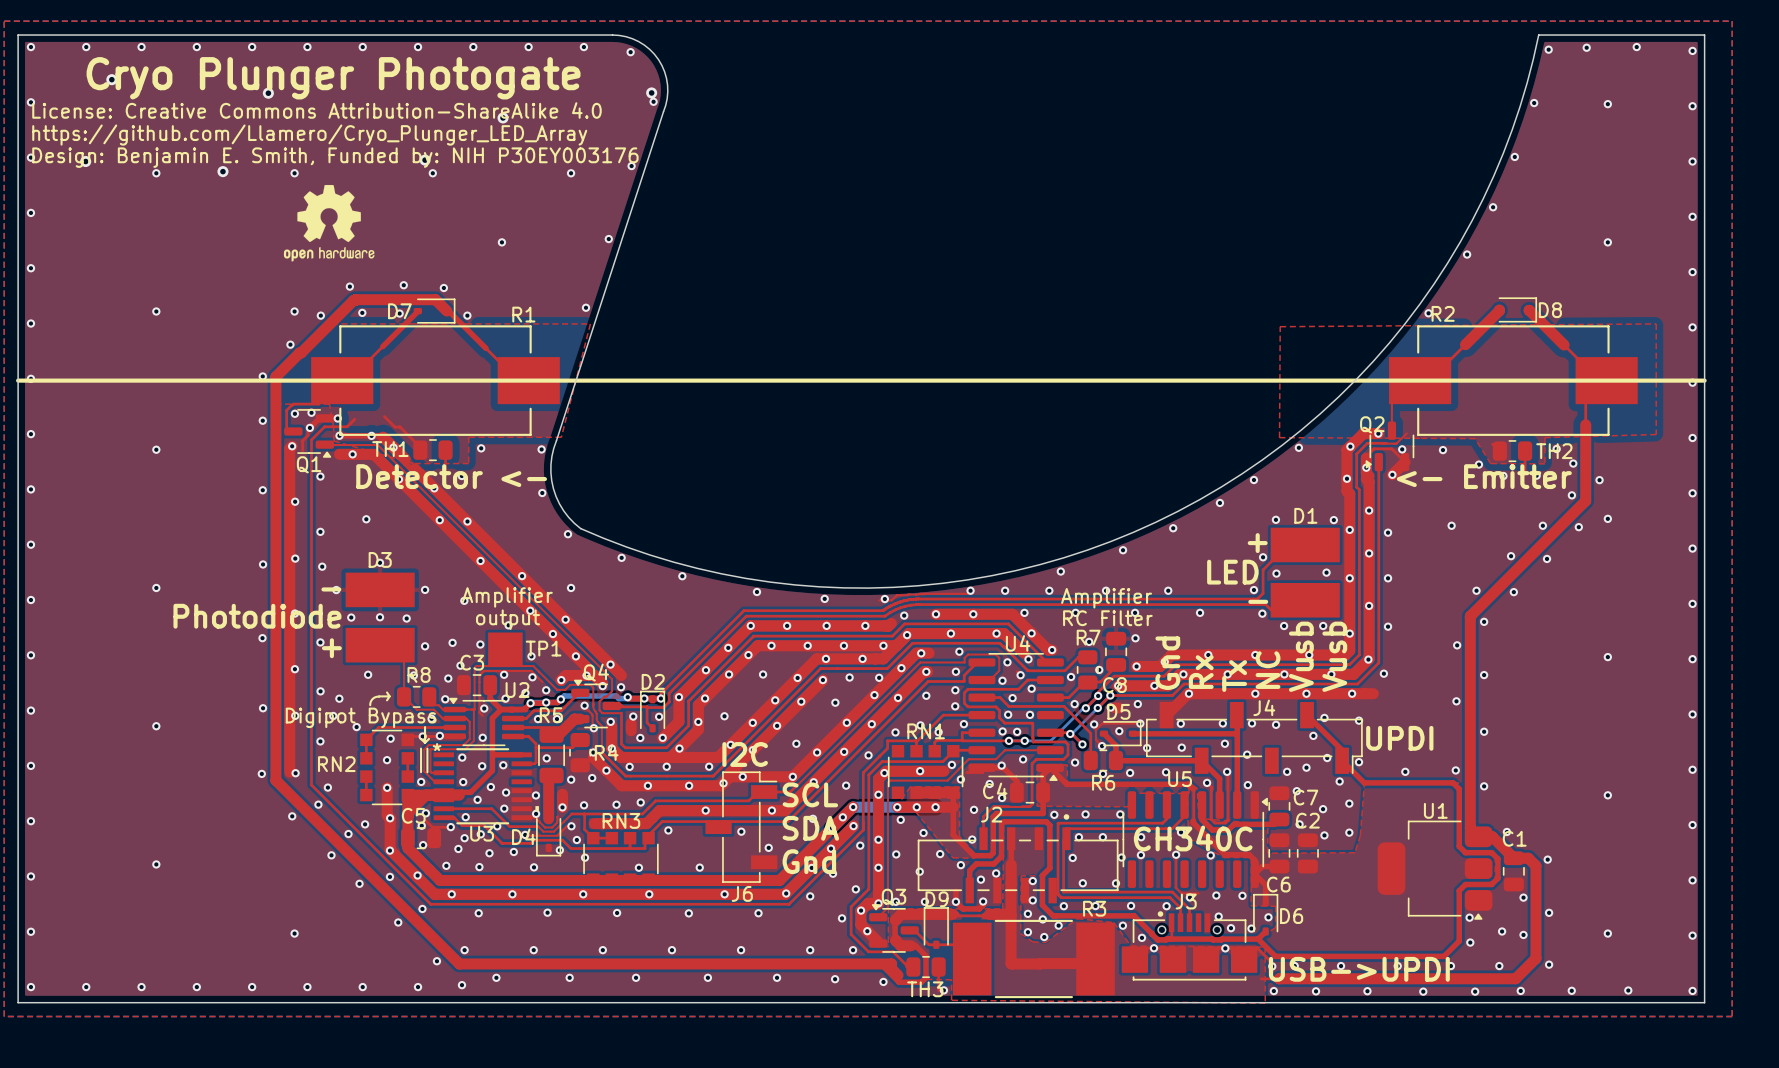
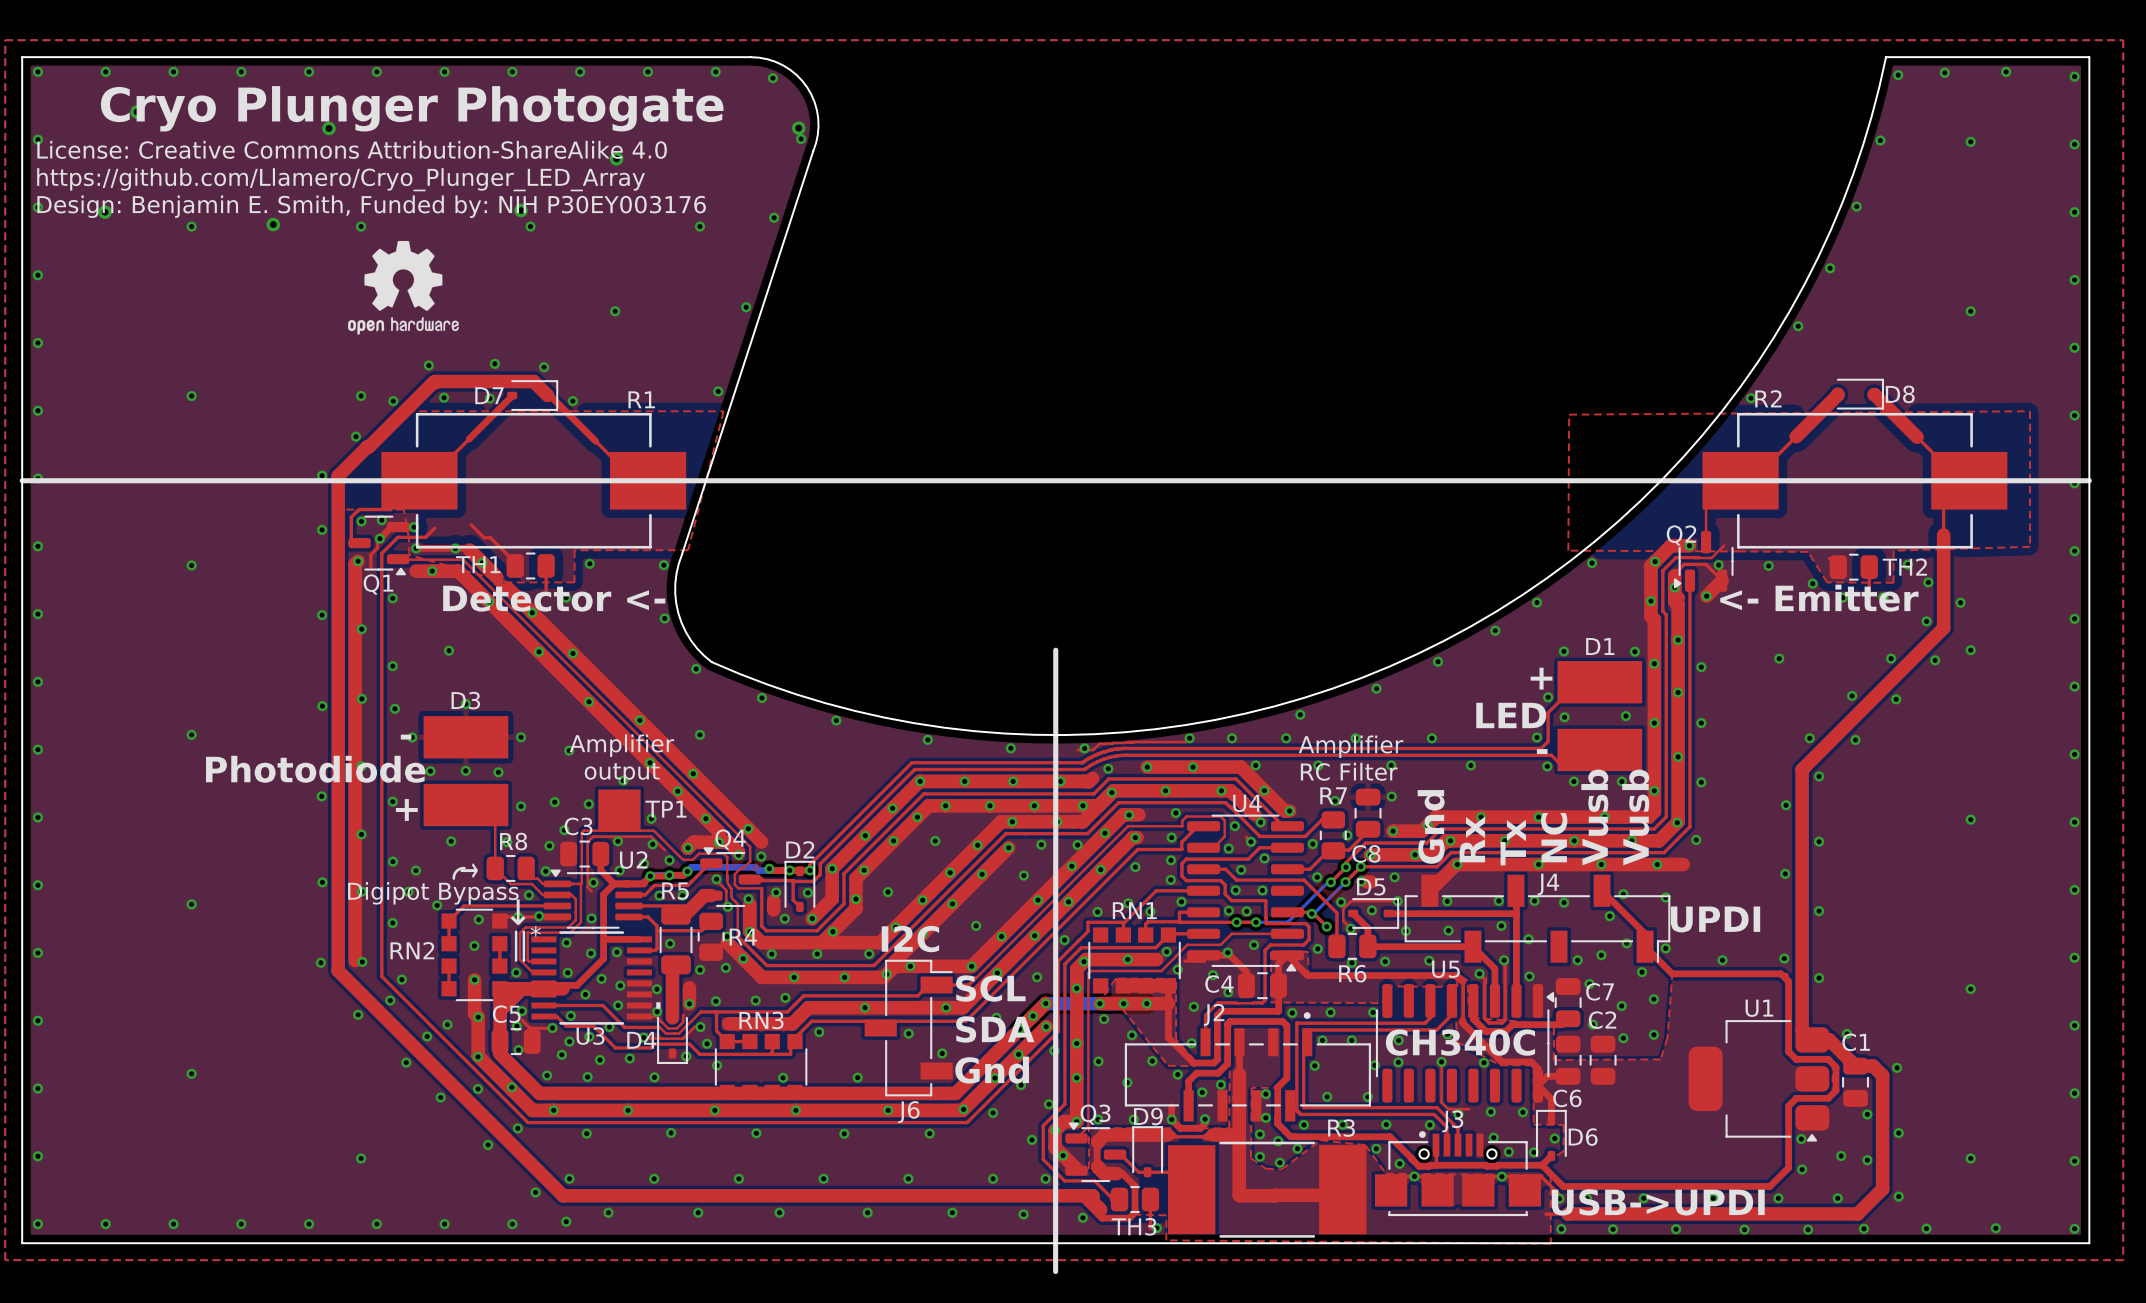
line: none -> (1055, 650) (1055, 1271)

